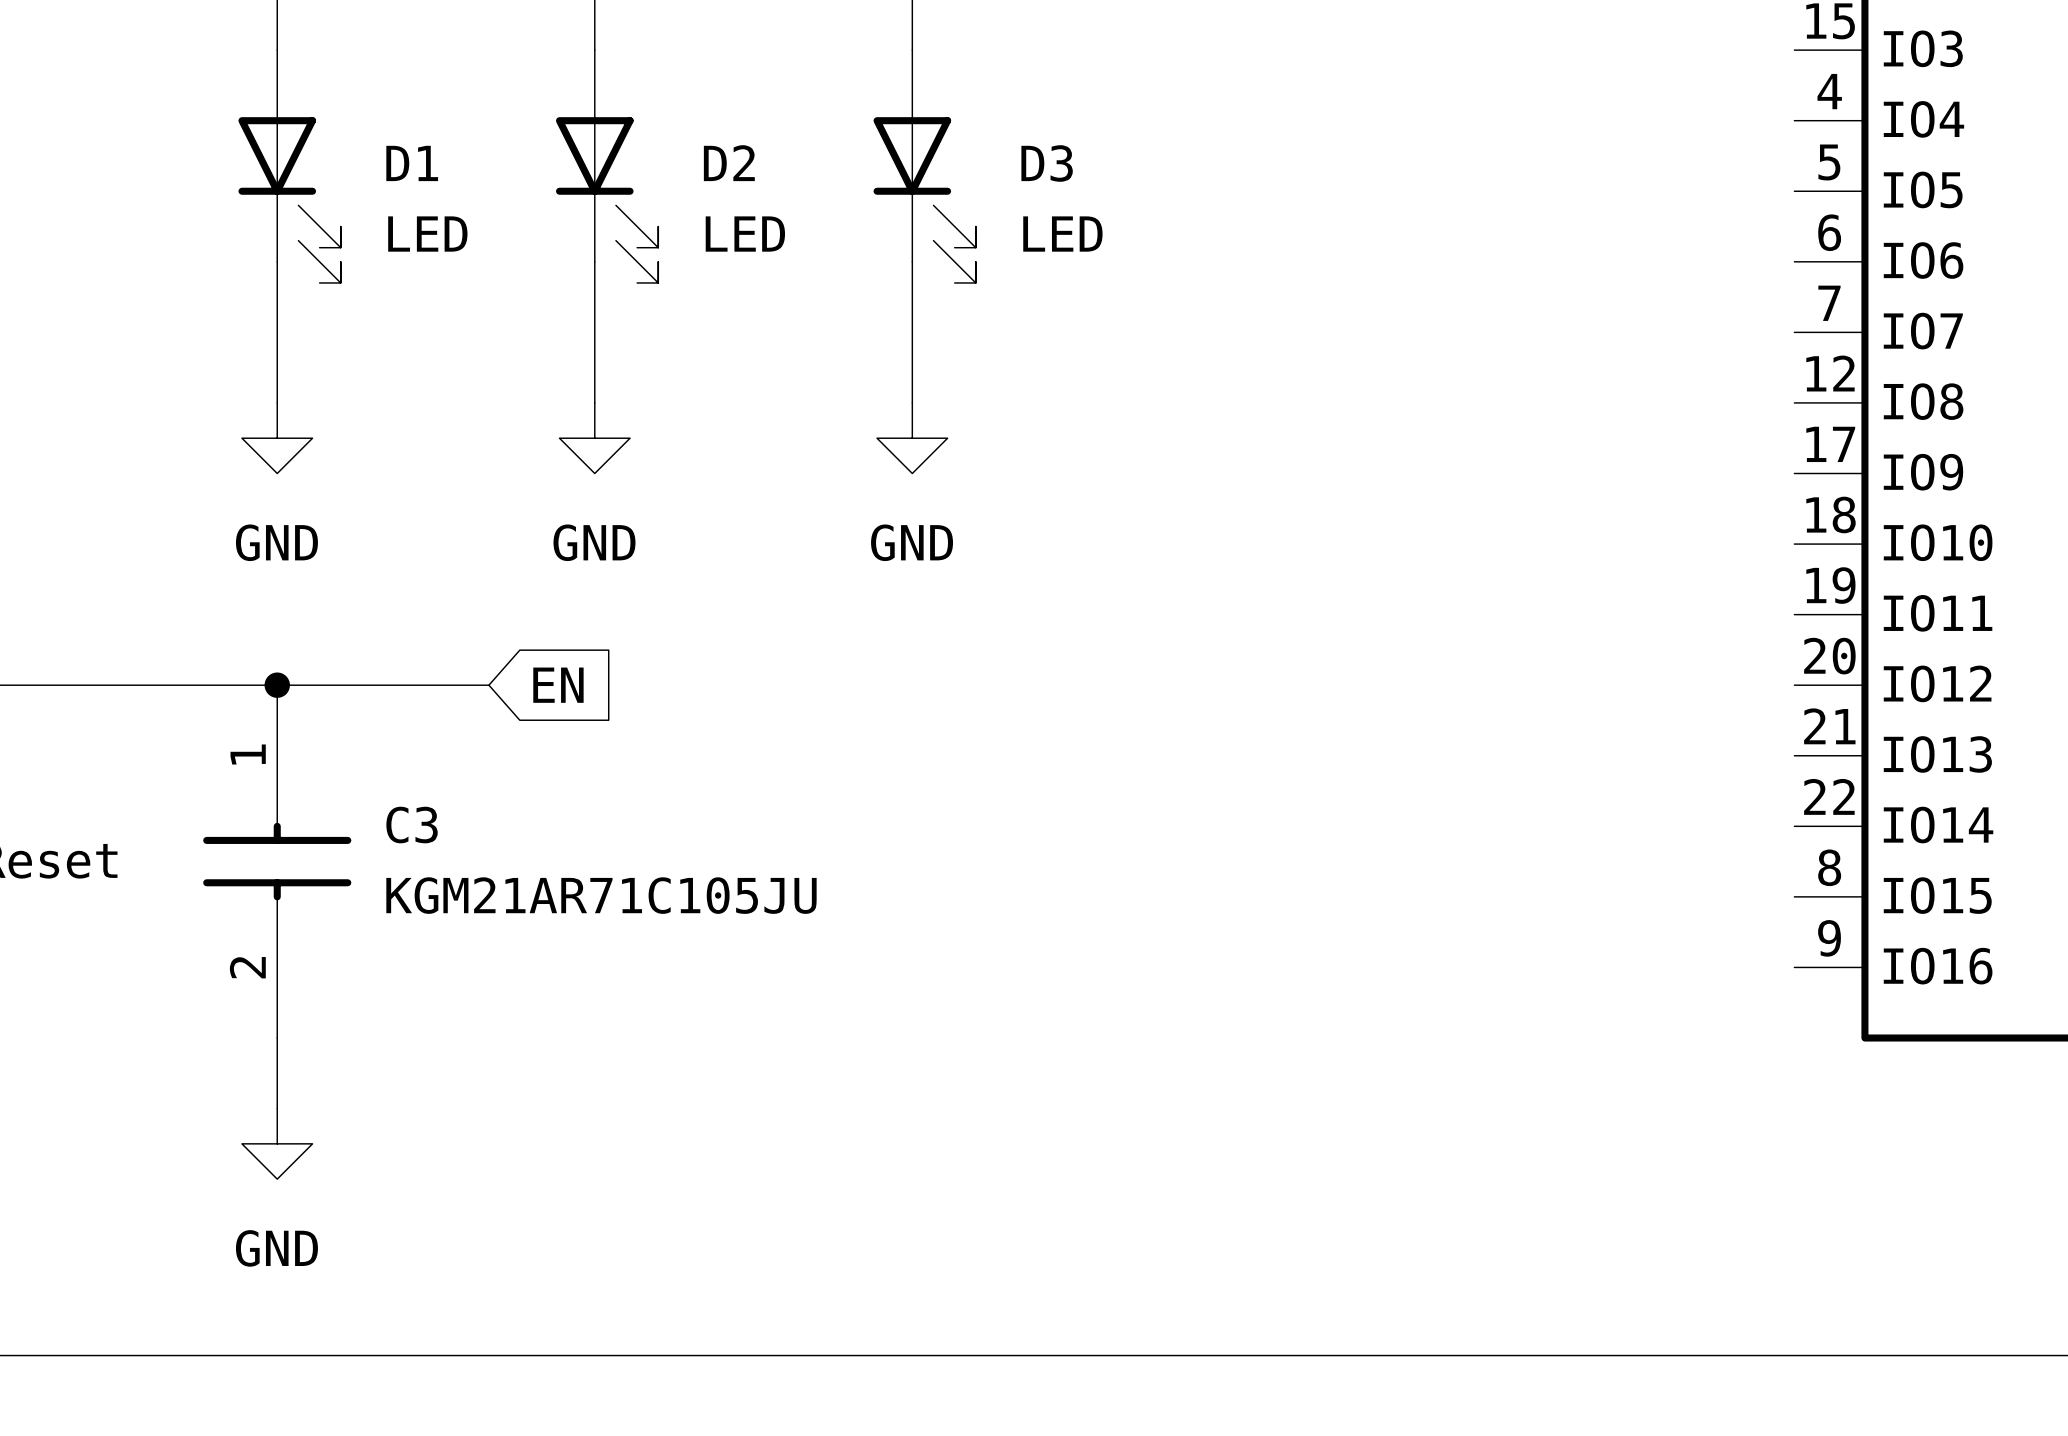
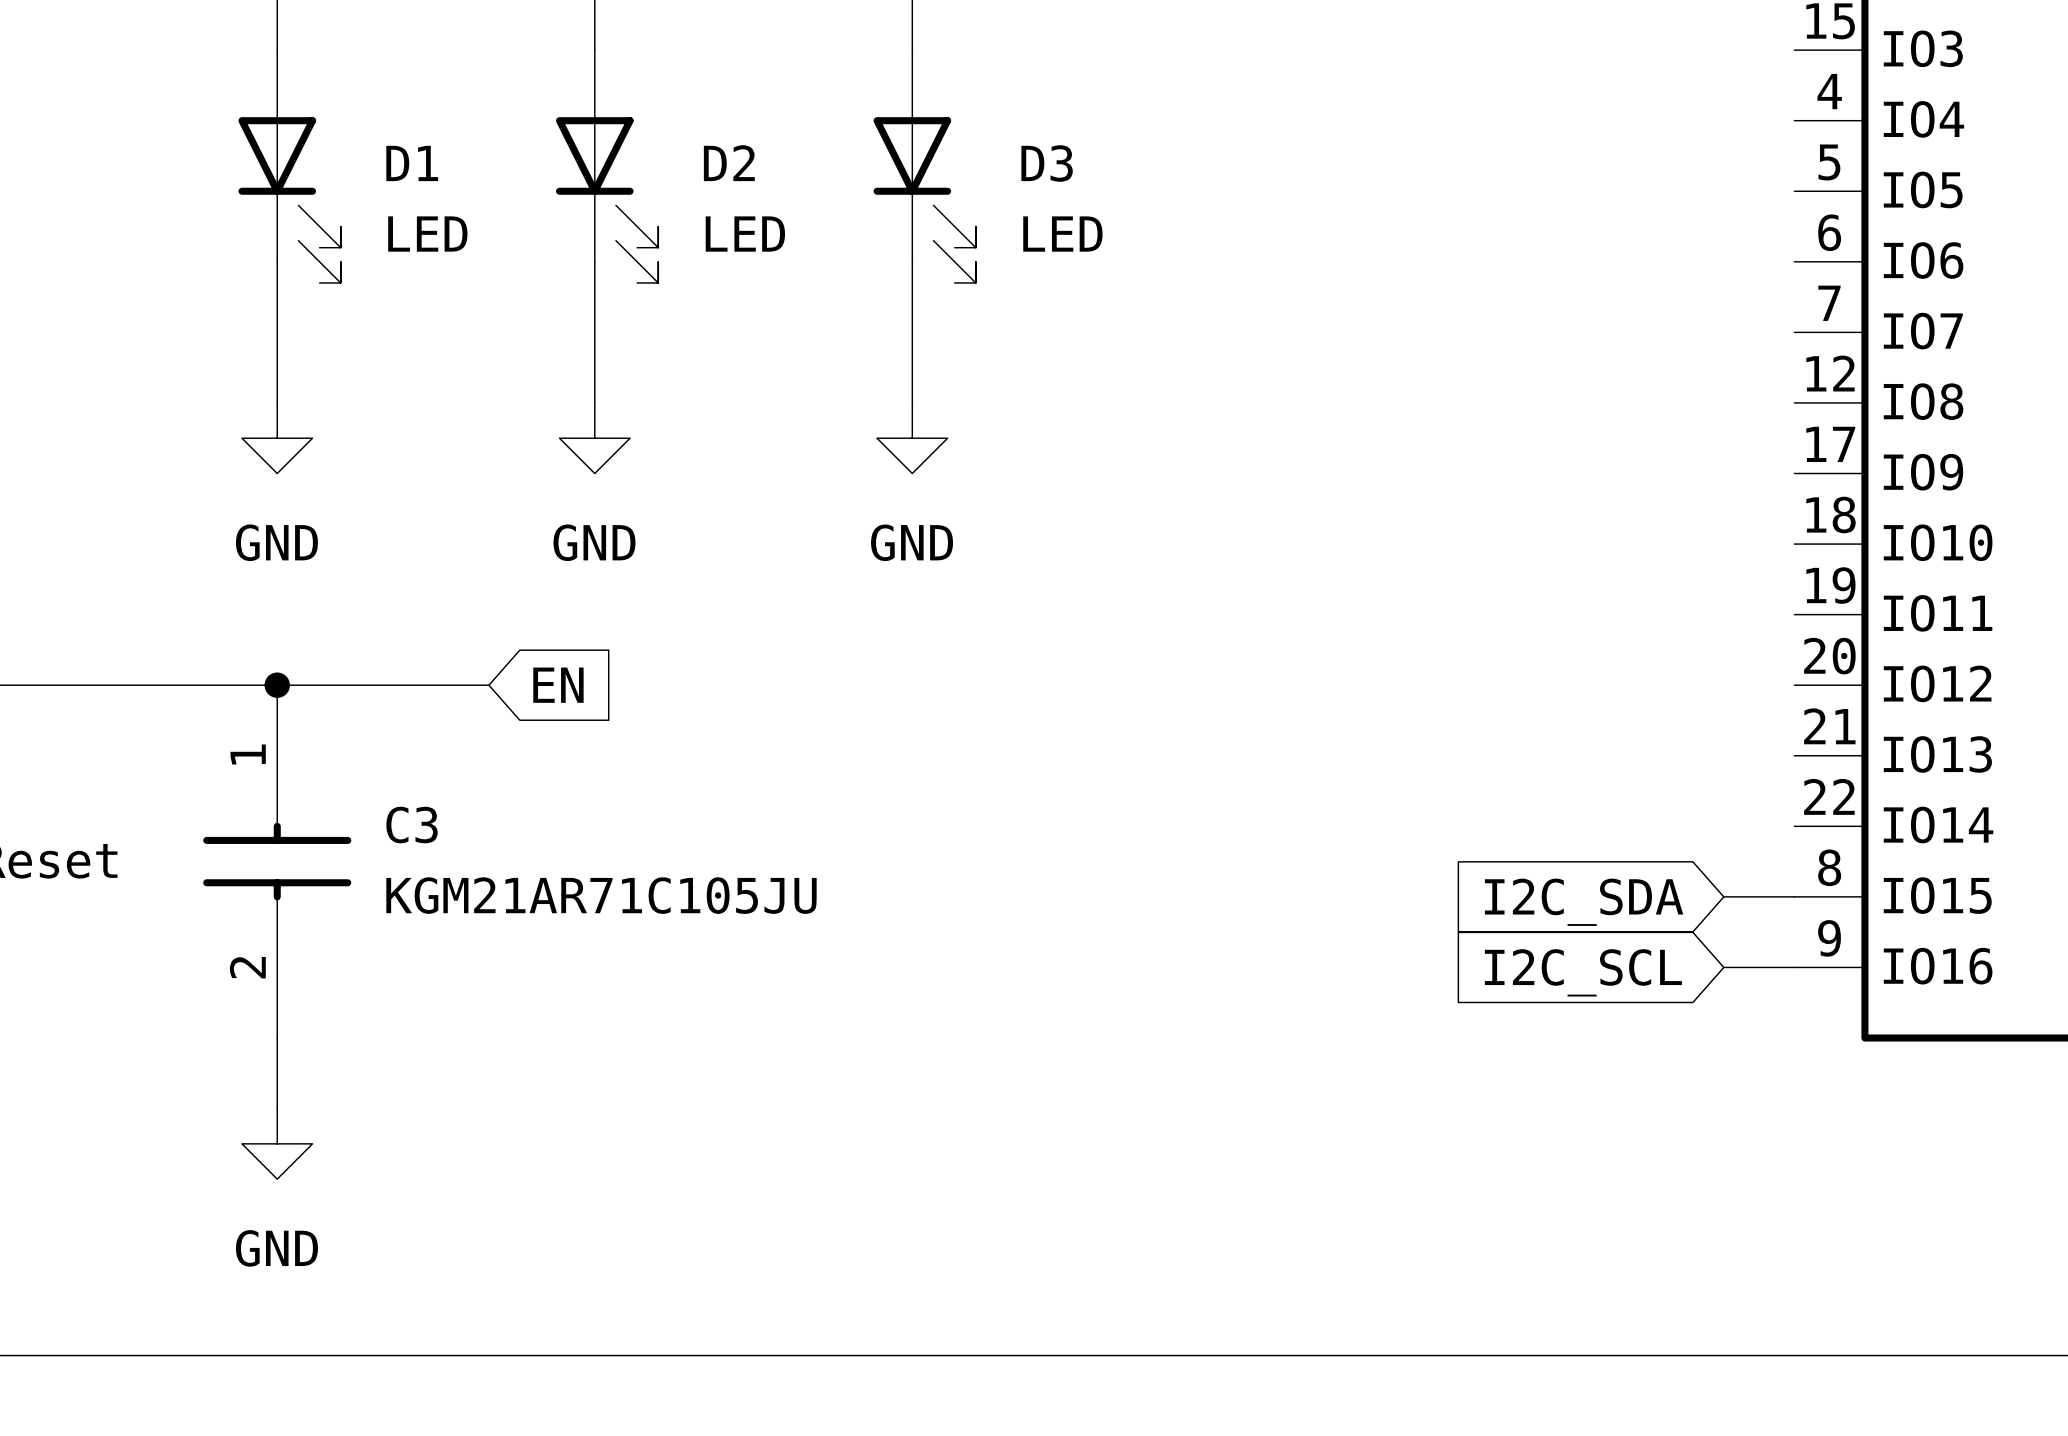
wire: none -> (1723, 896) (1794, 896)
global label: none -> I2C_SDA (1584, 902)
wire: none -> (1723, 967) (1794, 967)
global label: none -> I2C_SCL (1583, 972)

